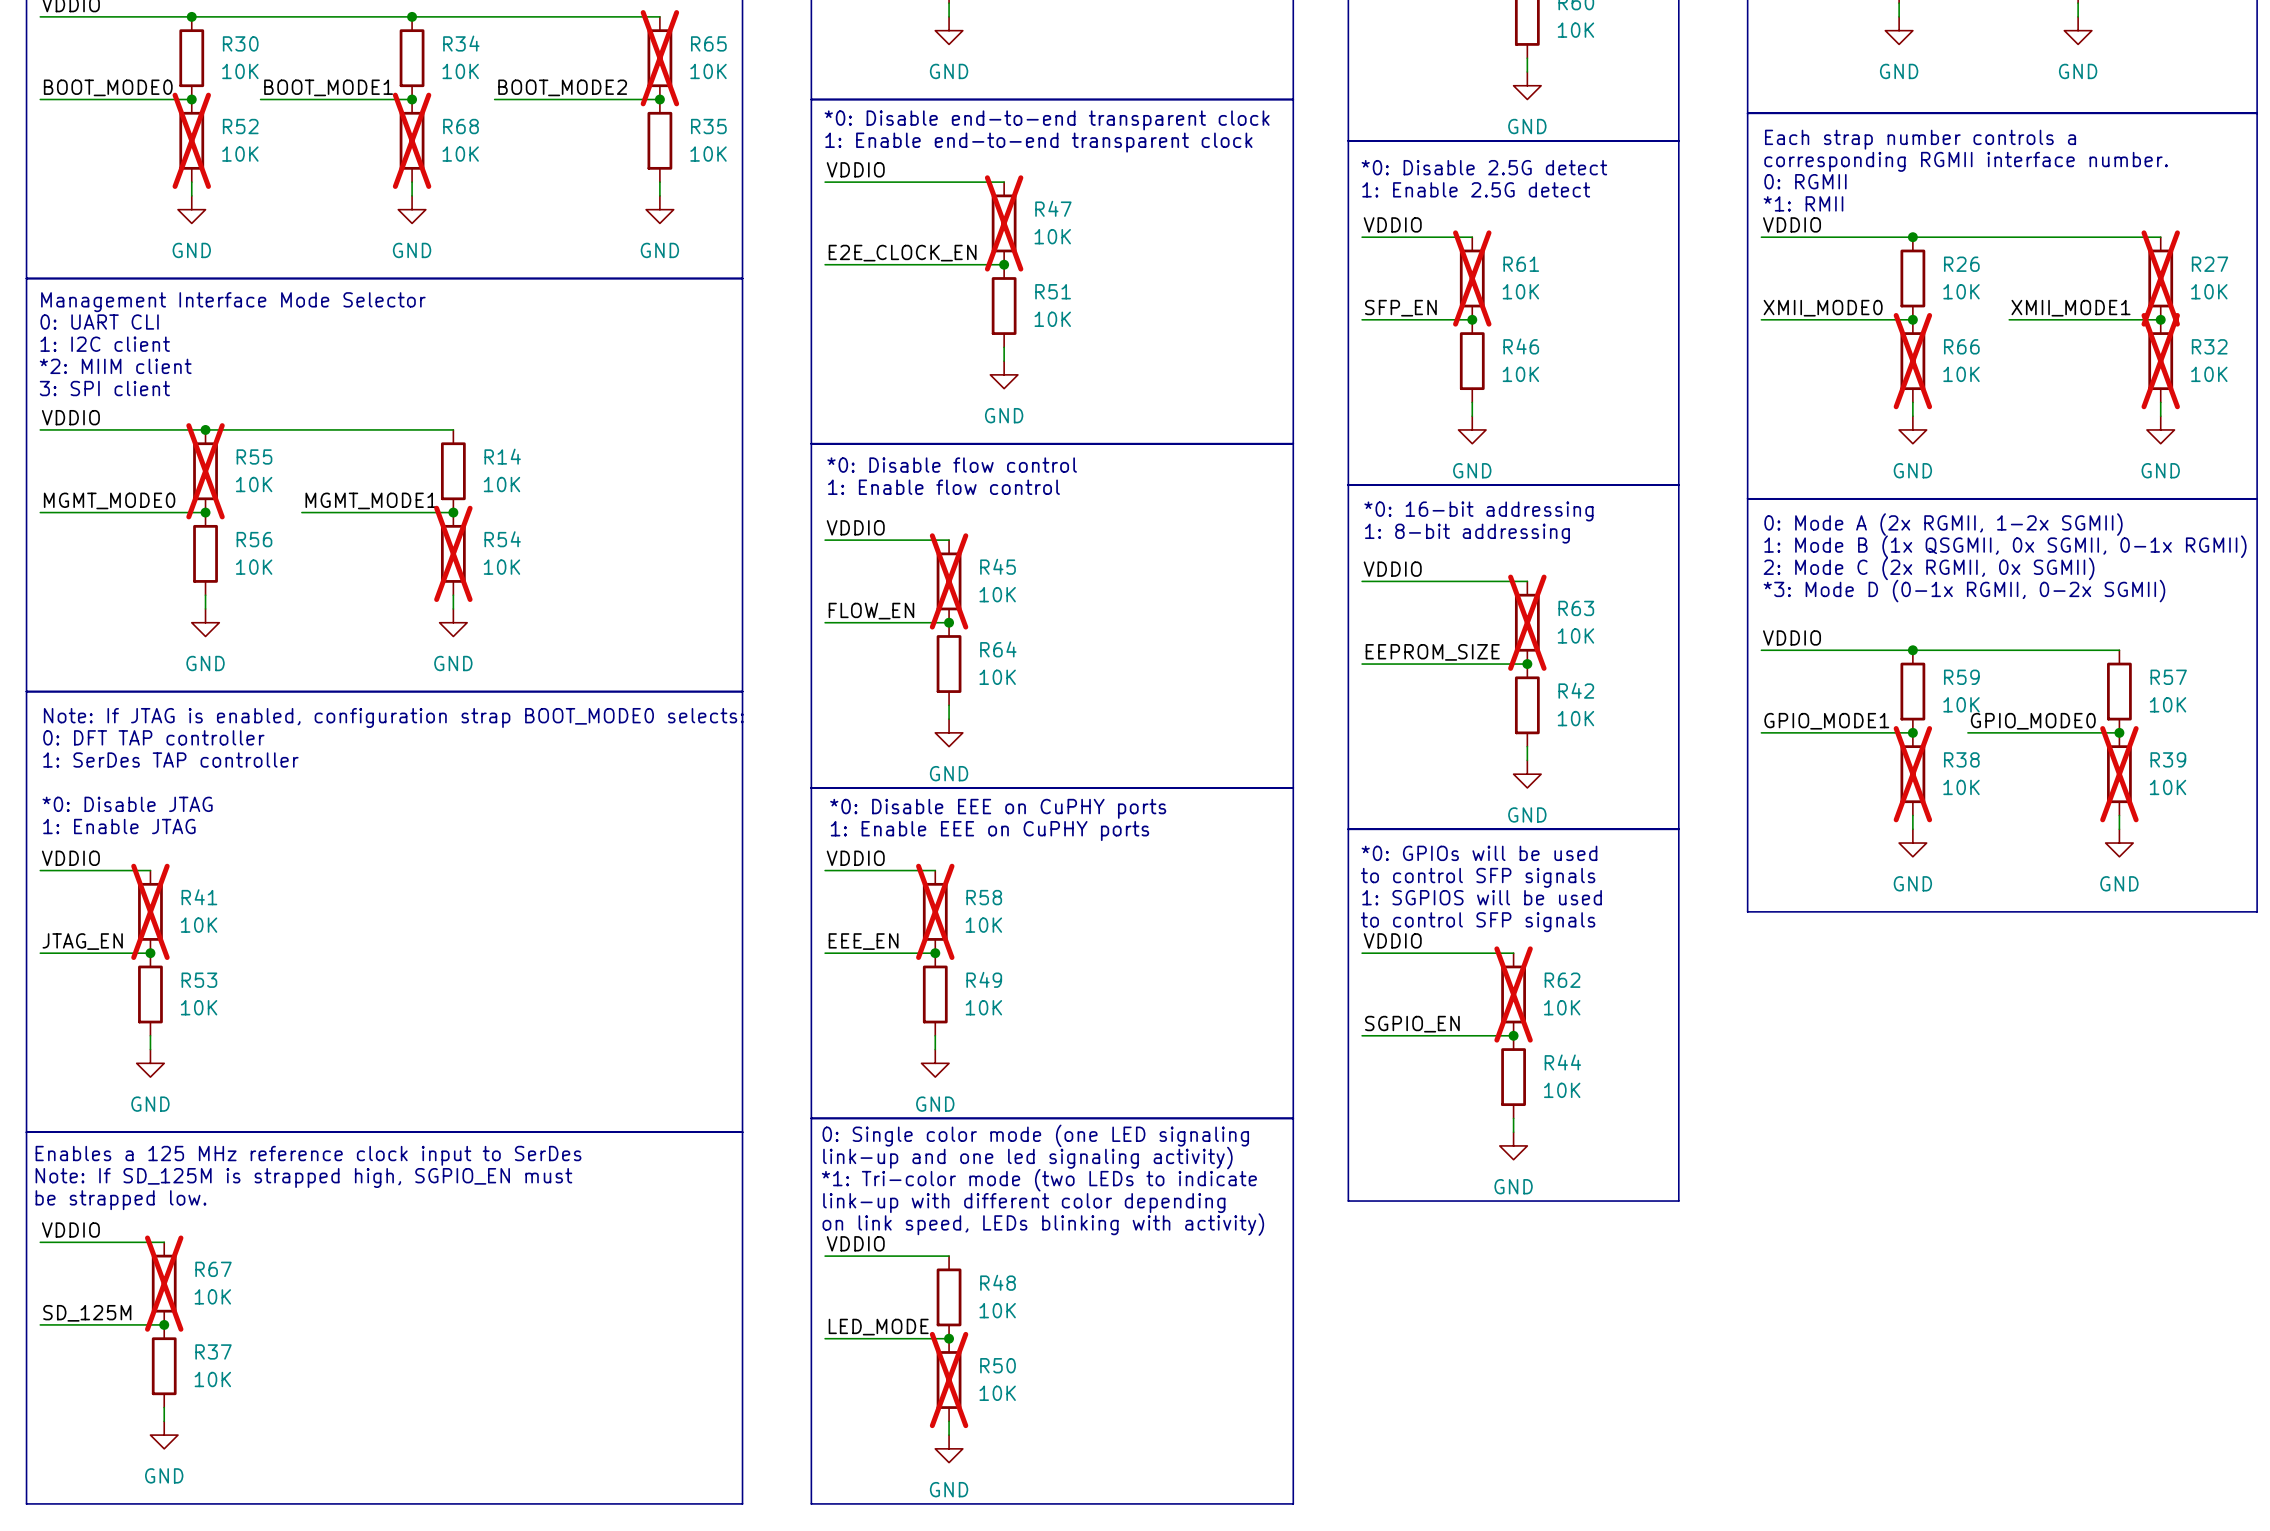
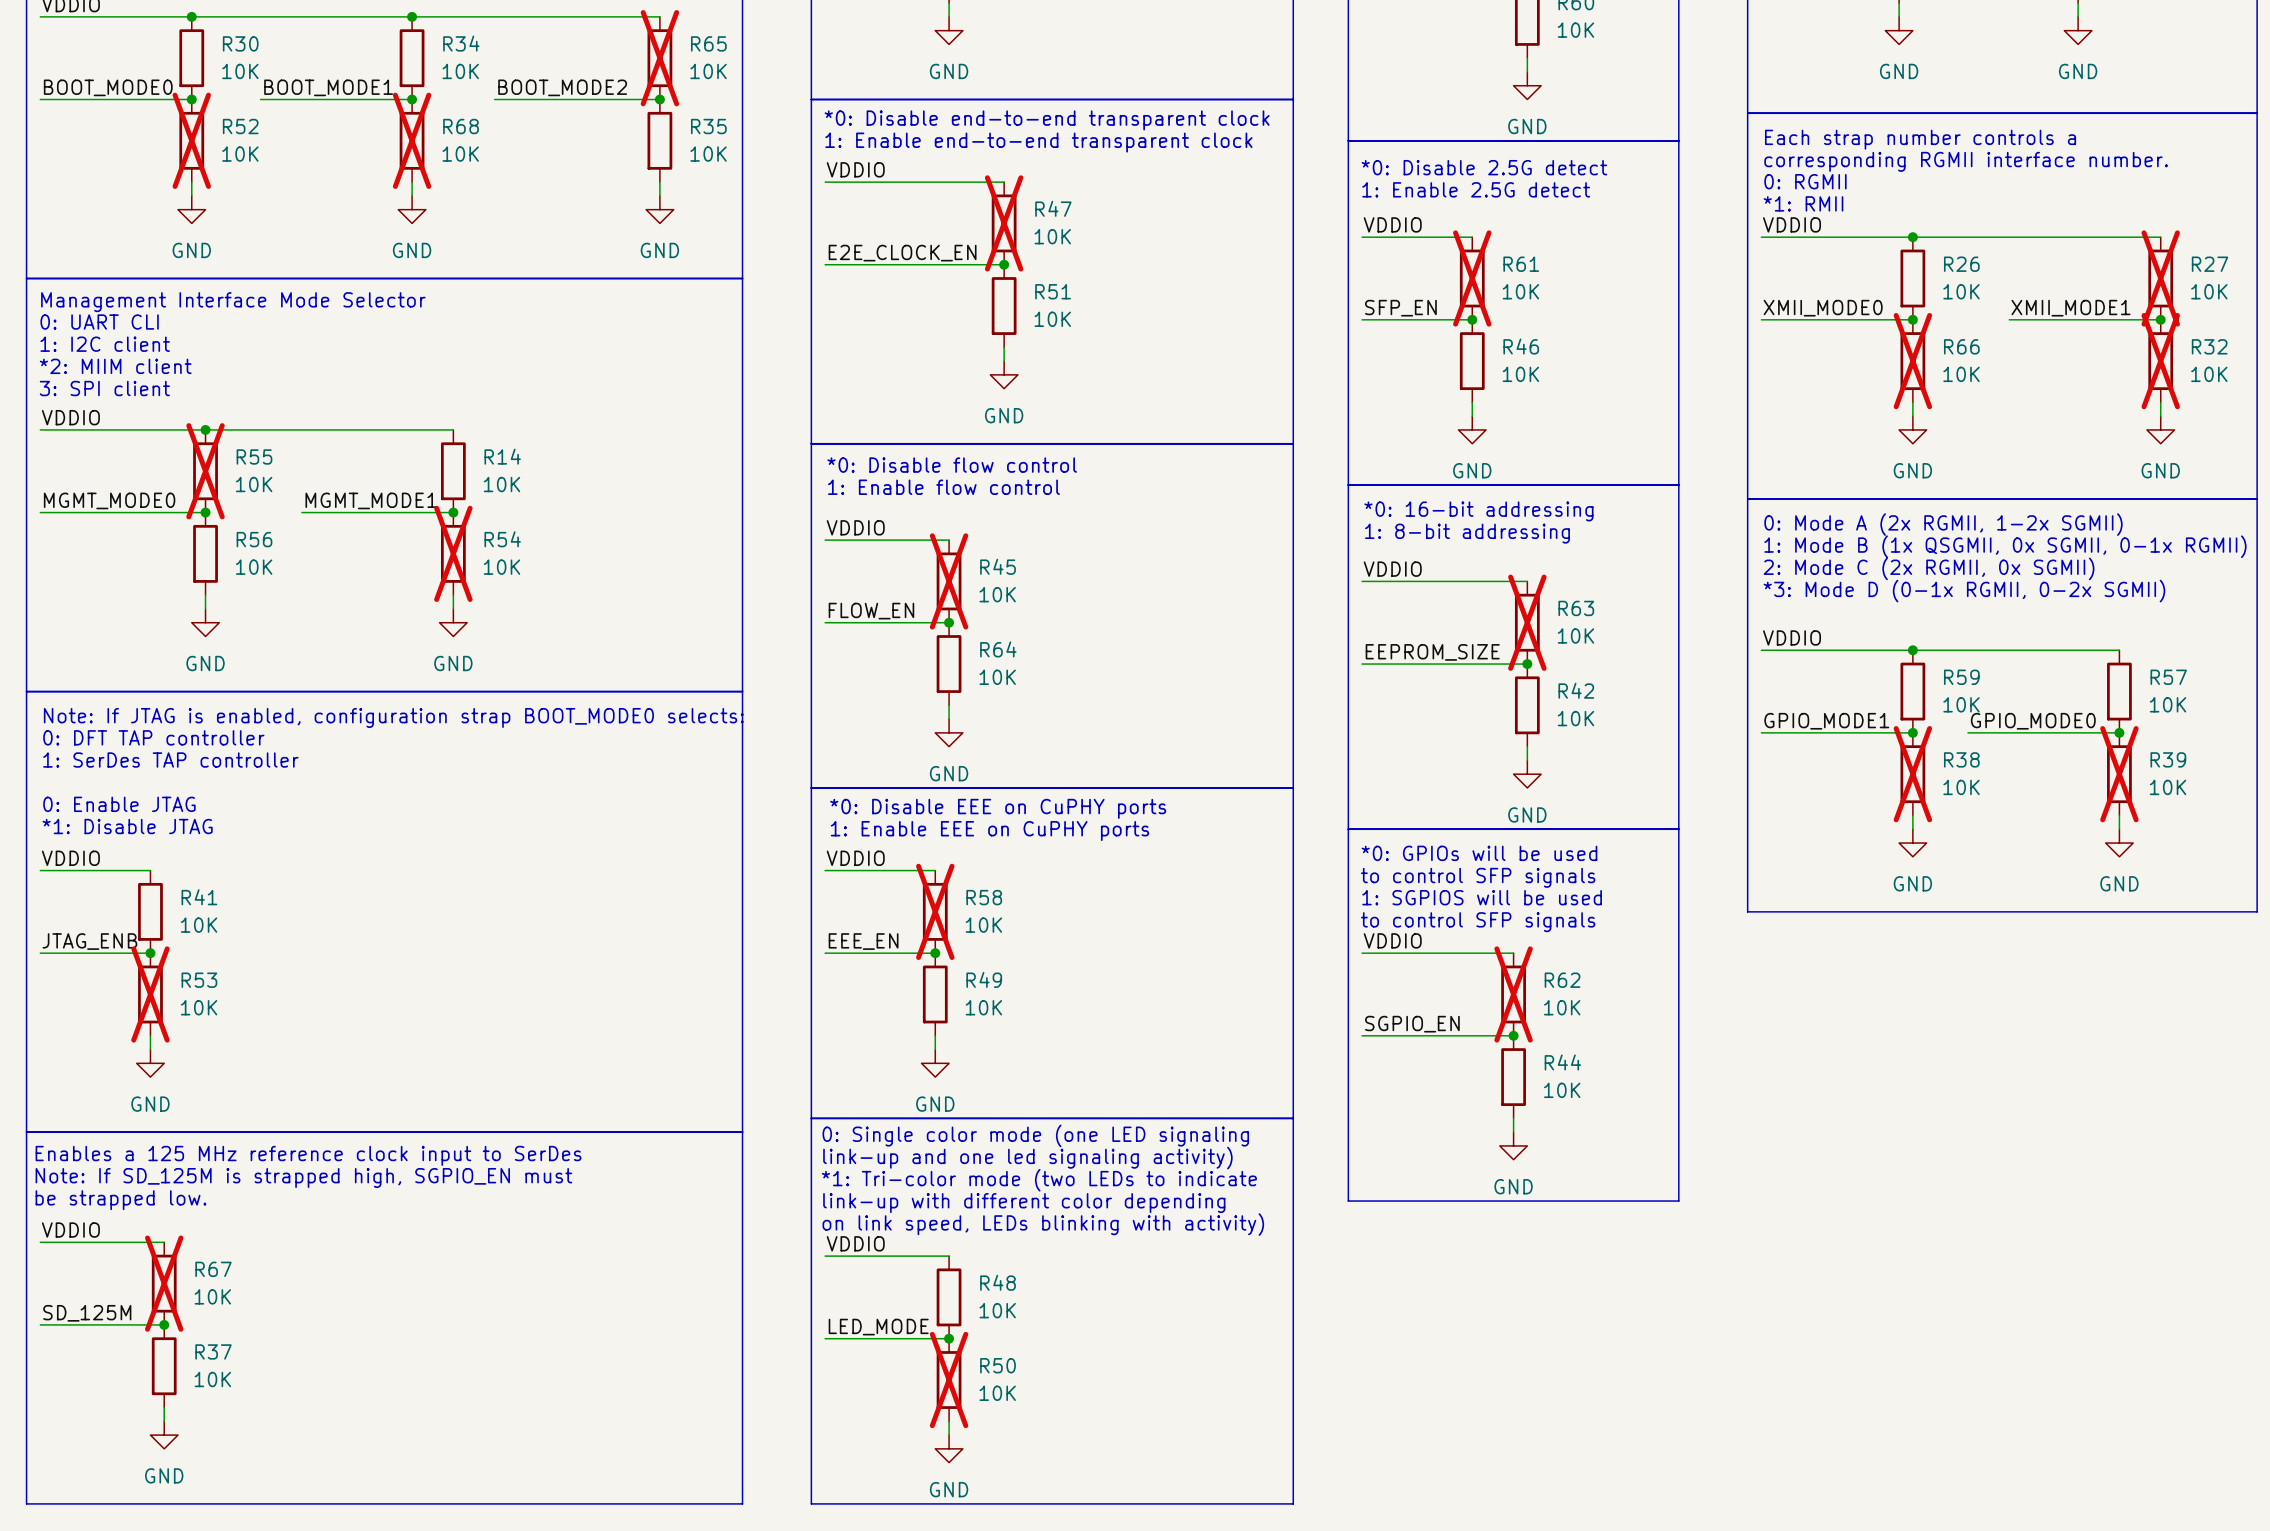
text: *0: Disable JTAG (127, 804) -> 0: Enable JTAG (119, 804)
text: 1: Enable JTAG (119, 826) -> *1: Disable JTAG (127, 826)
R41 do-not-place cross: (150, 911) -> none
label: JTAG_EN (82, 941) -> JTAG_ENB (89, 941)
R53 do-not-place cross: none -> (150, 994)

